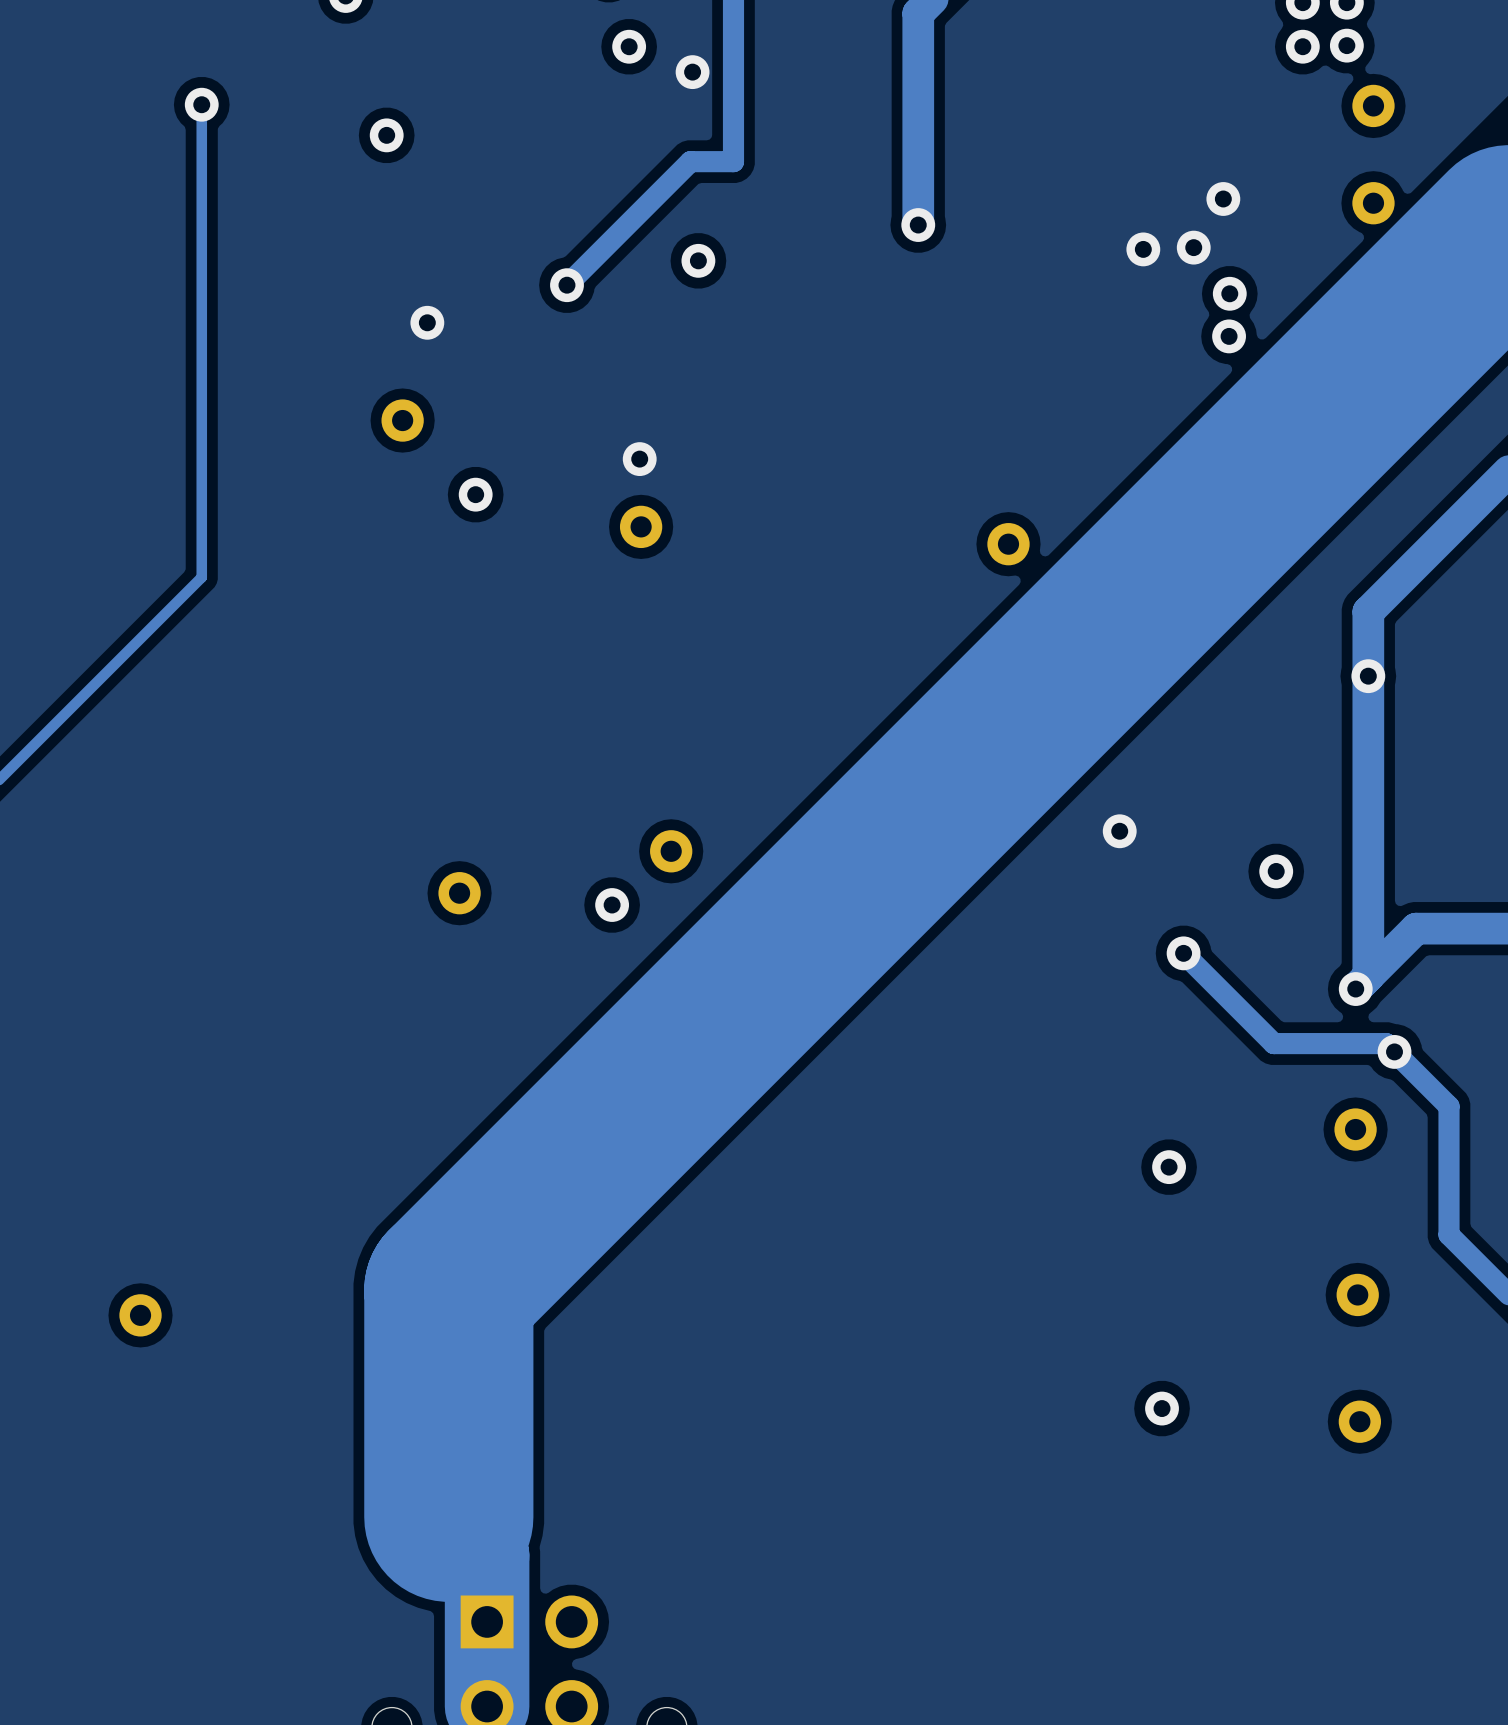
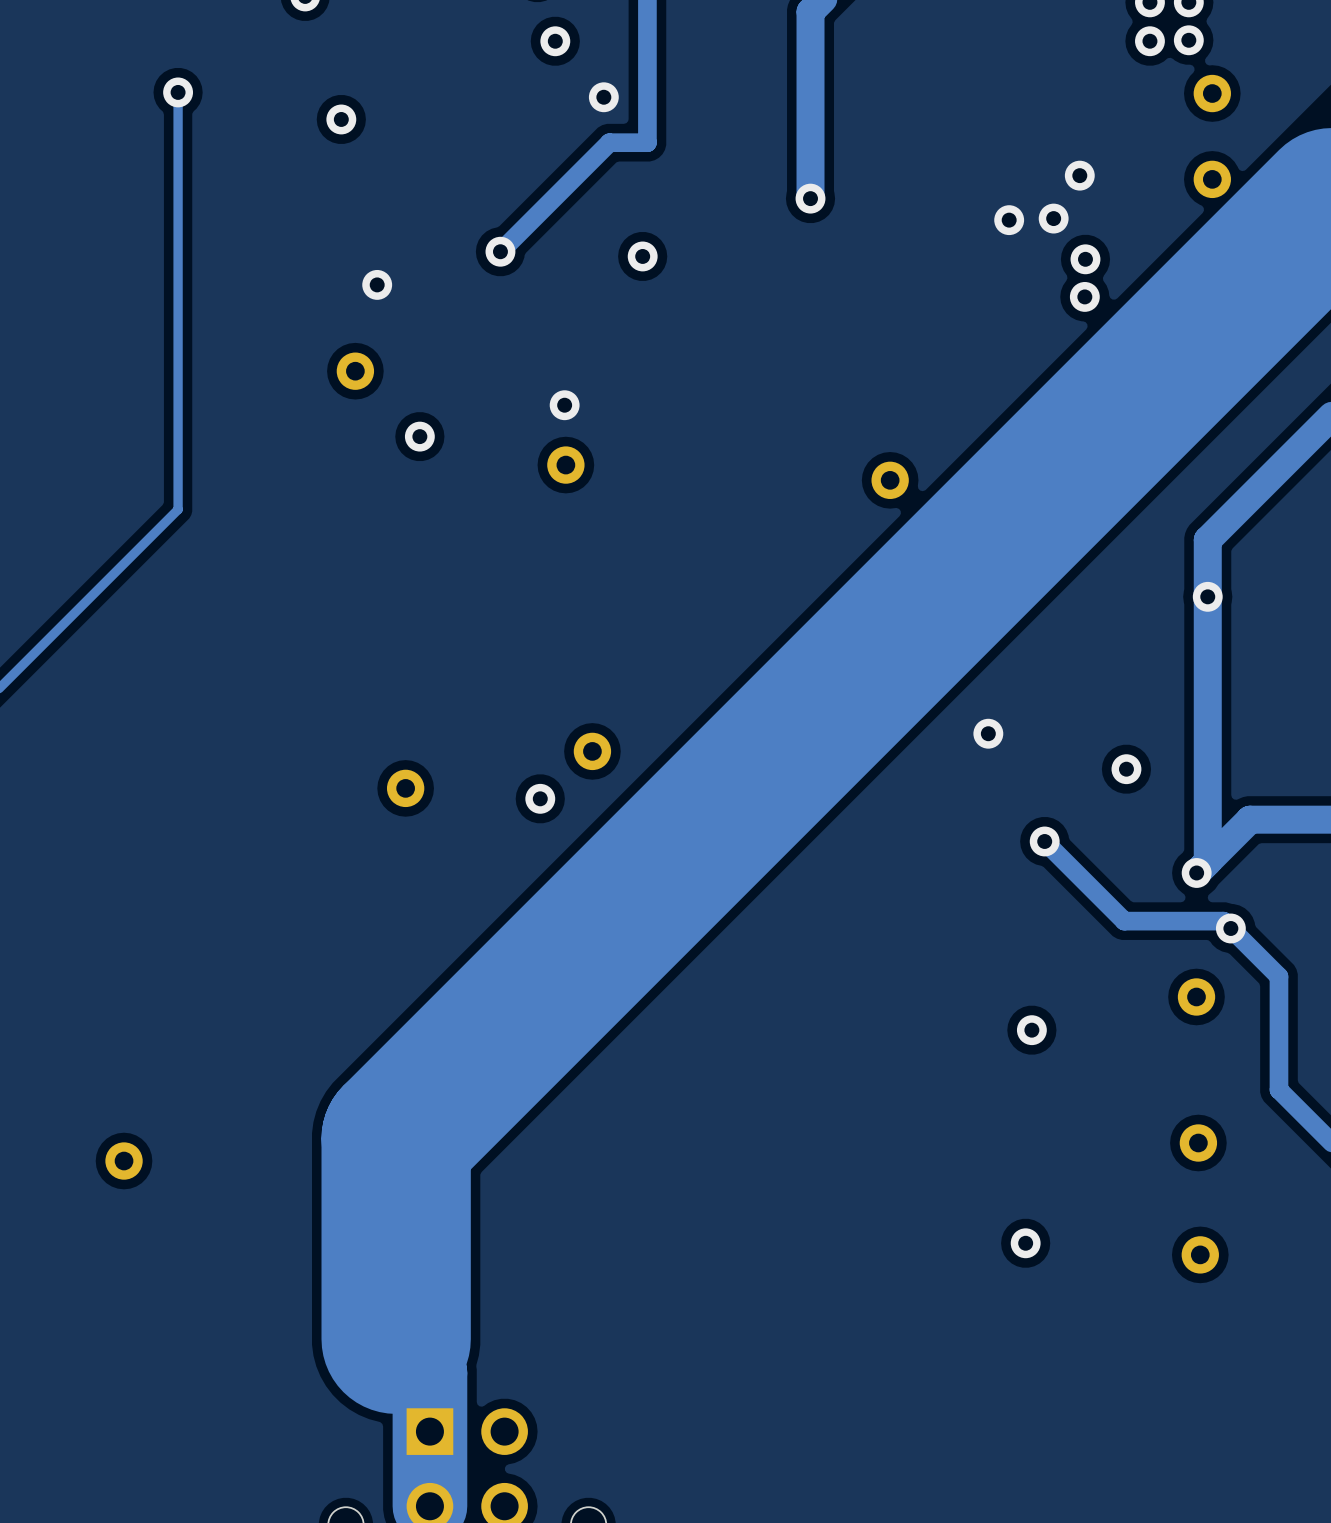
via position: (692, 72) -> (603, 97)
via position: (698, 260) -> (642, 256)

